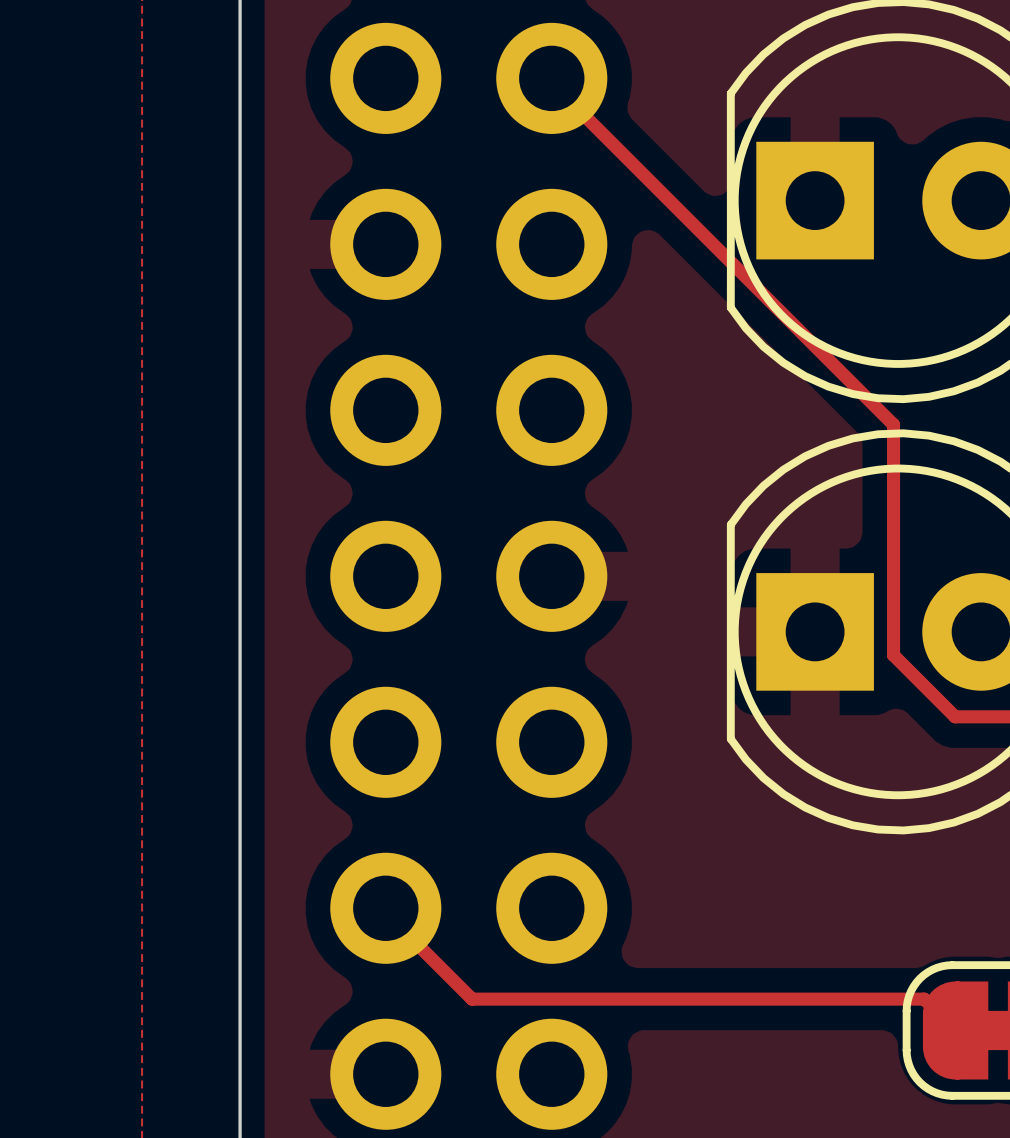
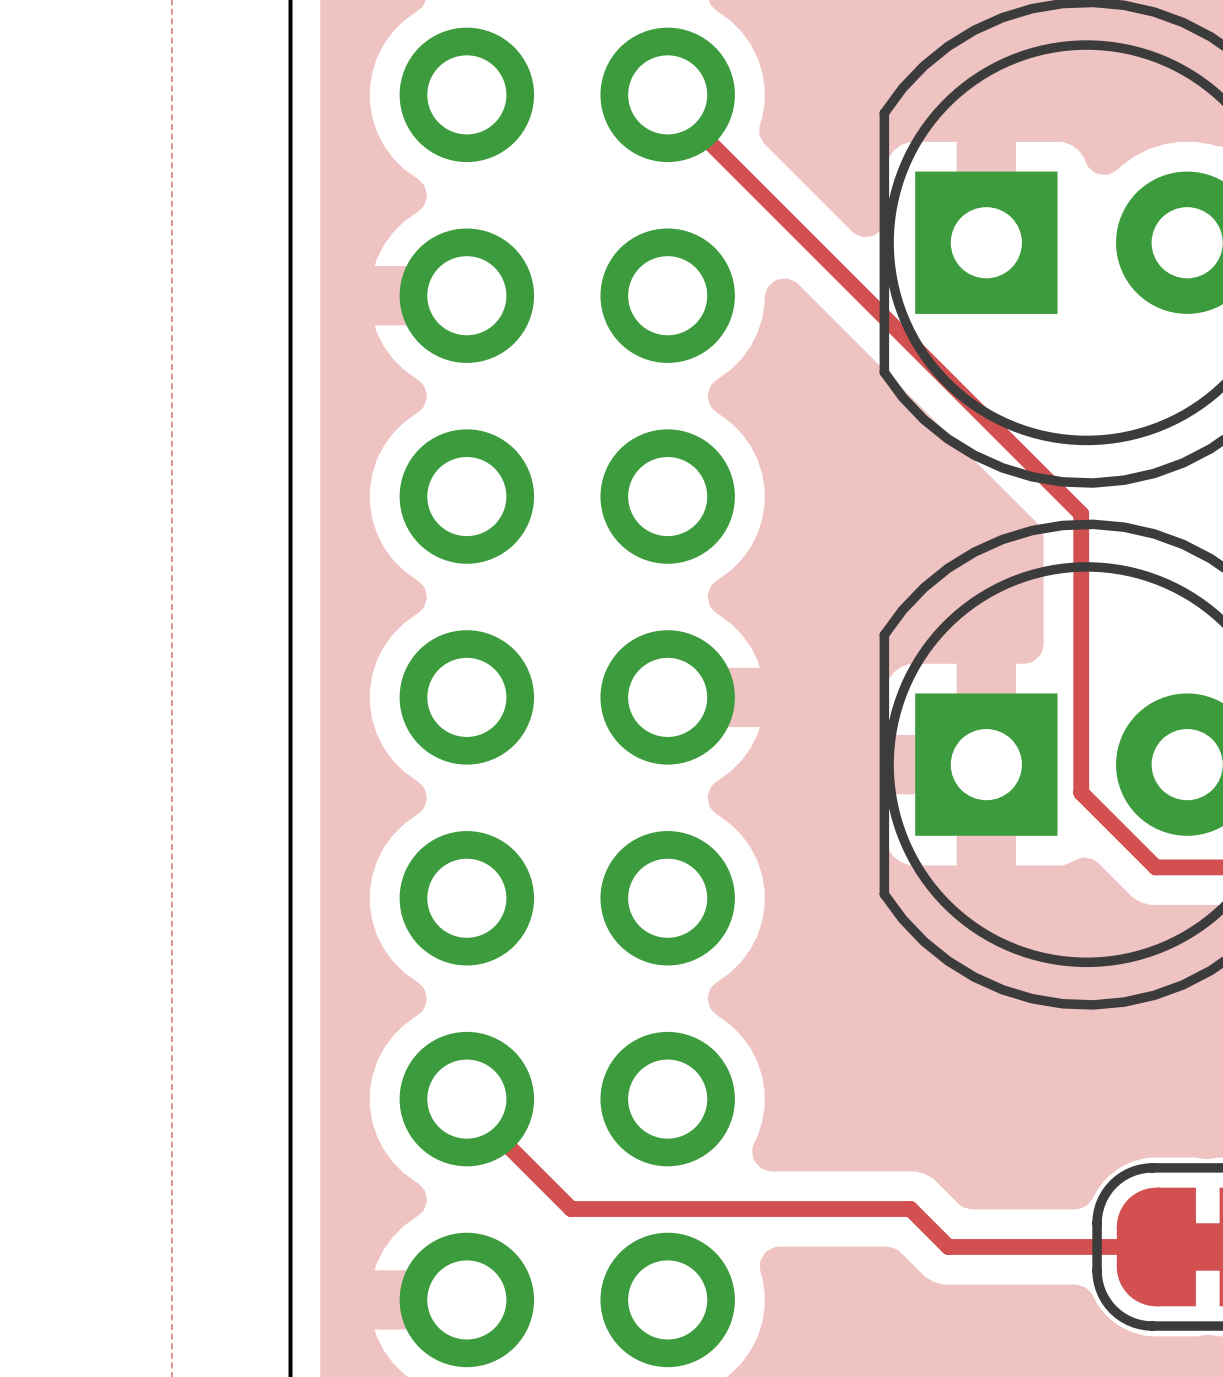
track: (752, 999) (924, 999) (955, 1030) -> (910, 1209) (948, 1246) (1156, 1246)

